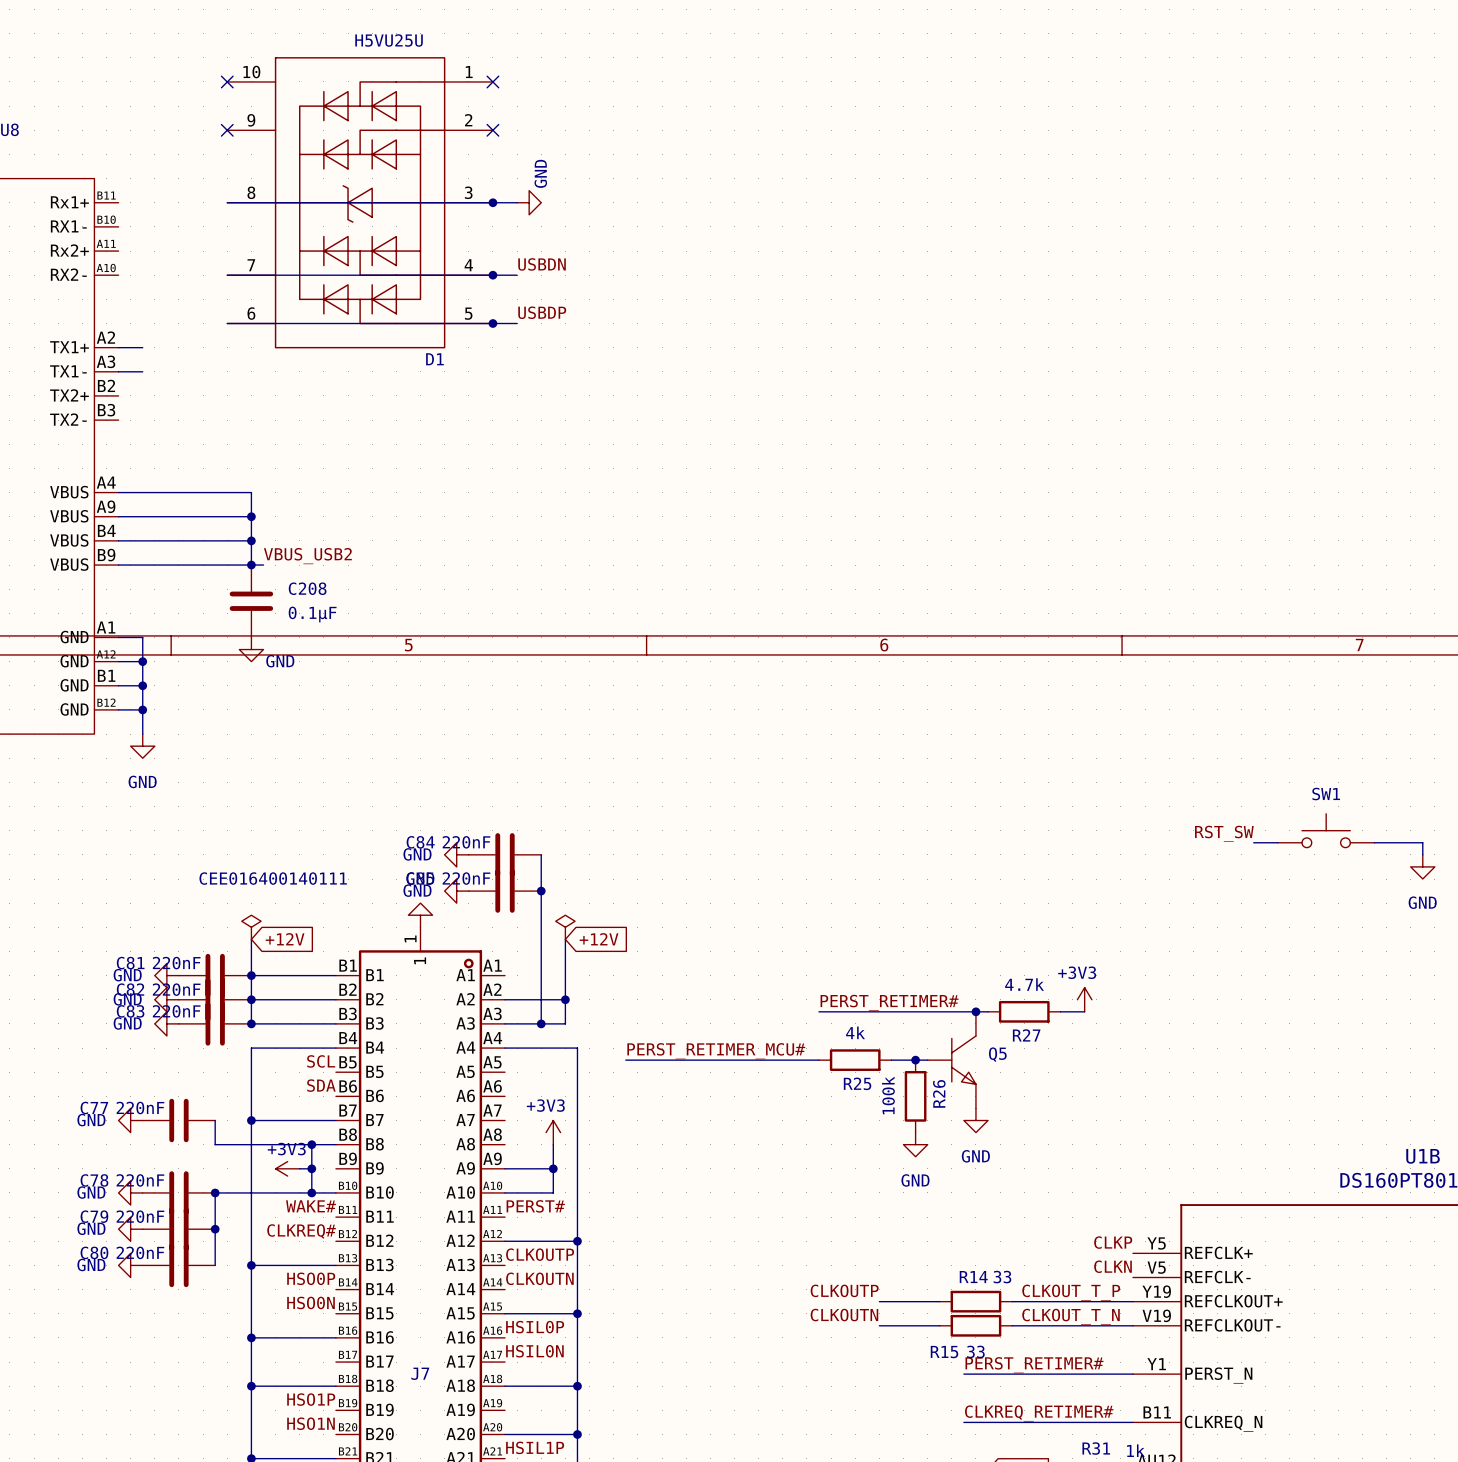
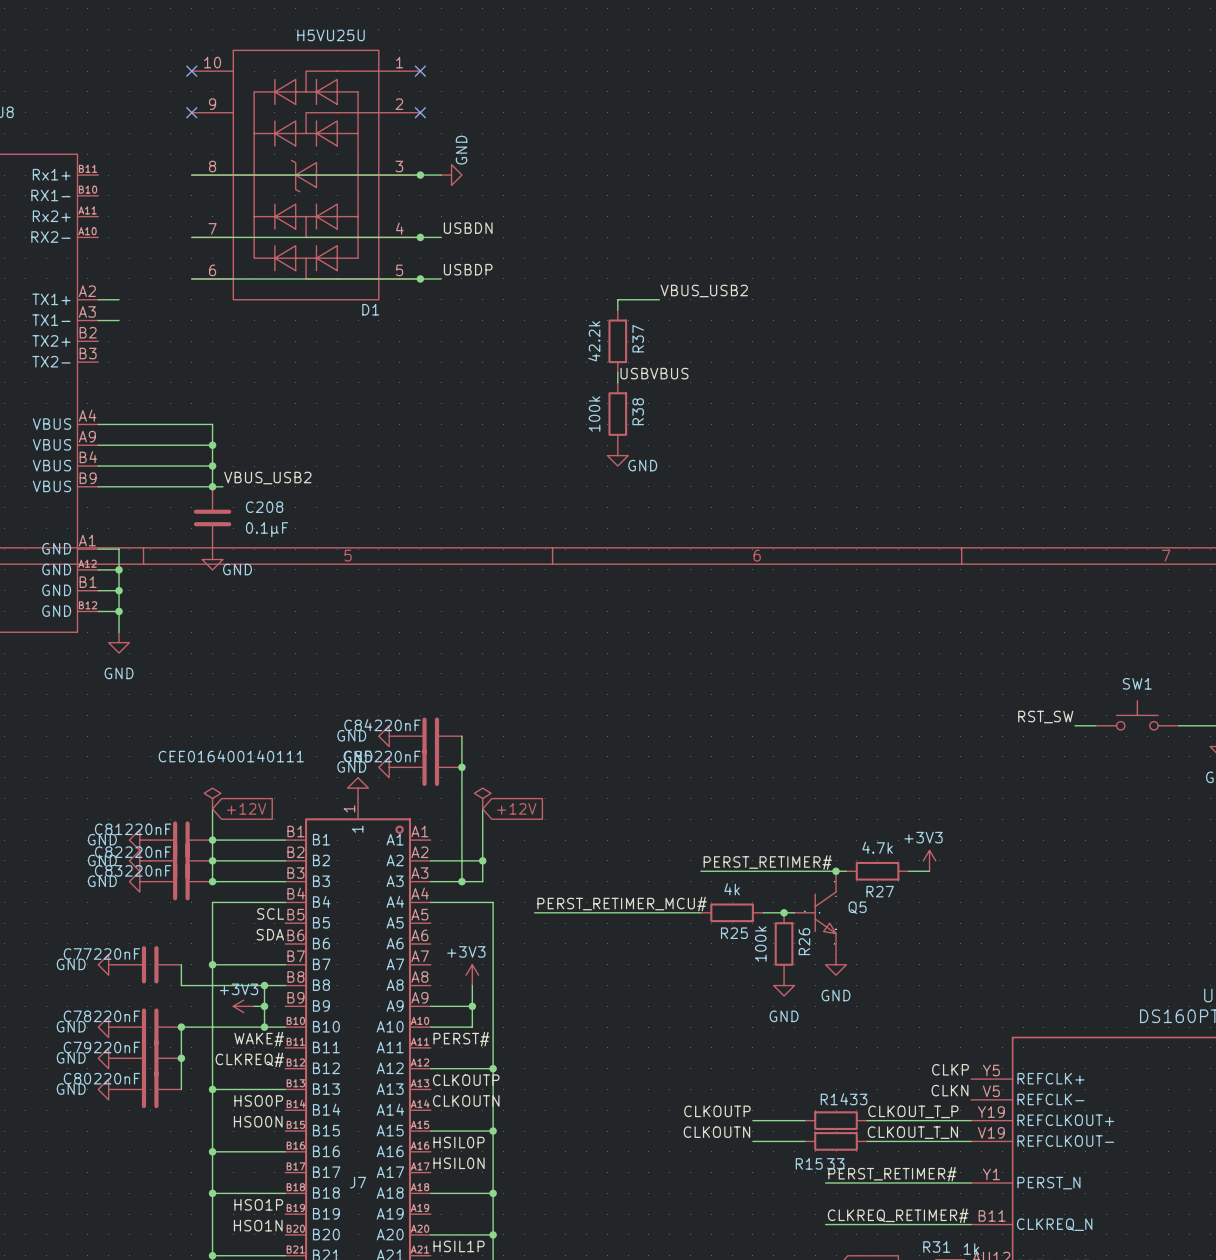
label: none -> VBUS_USB2 (704, 290)
wire: none -> (659, 299) (617, 299) (617, 310)
R37: none -> 42.2k (617, 341)
wire: none -> (617, 372) (617, 382)
label: none -> USBVBUS (654, 373)
R38: none -> 100k (617, 414)
power symbol: none -> GND (617, 455)

